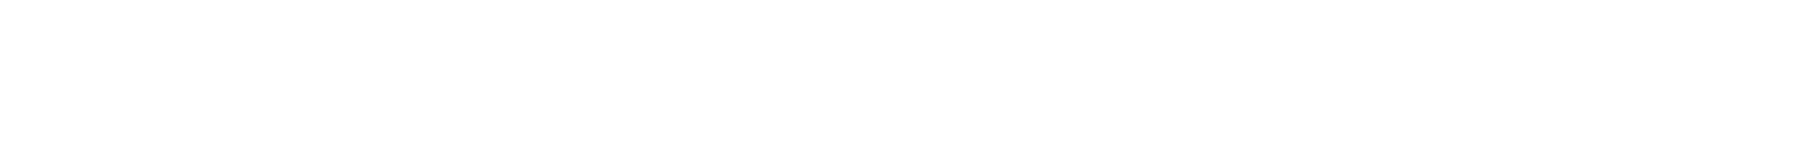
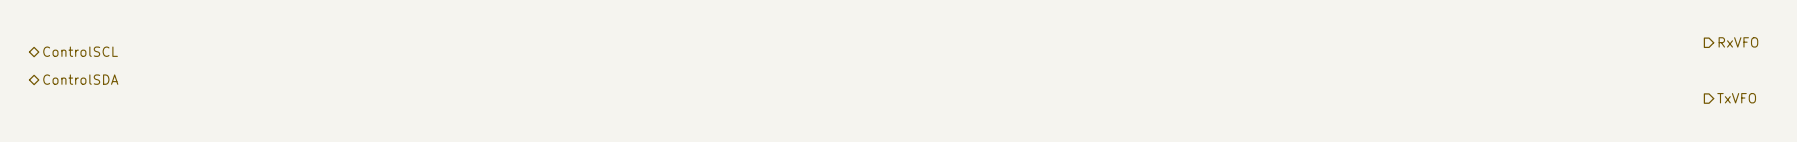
hierarchical label: none -> RxVFO (1738, 42)
hierarchical label: none -> ControlSCL (80, 51)
hierarchical label: none -> ControlSDA (80, 79)
hierarchical label: none -> TxVFO (1736, 98)

